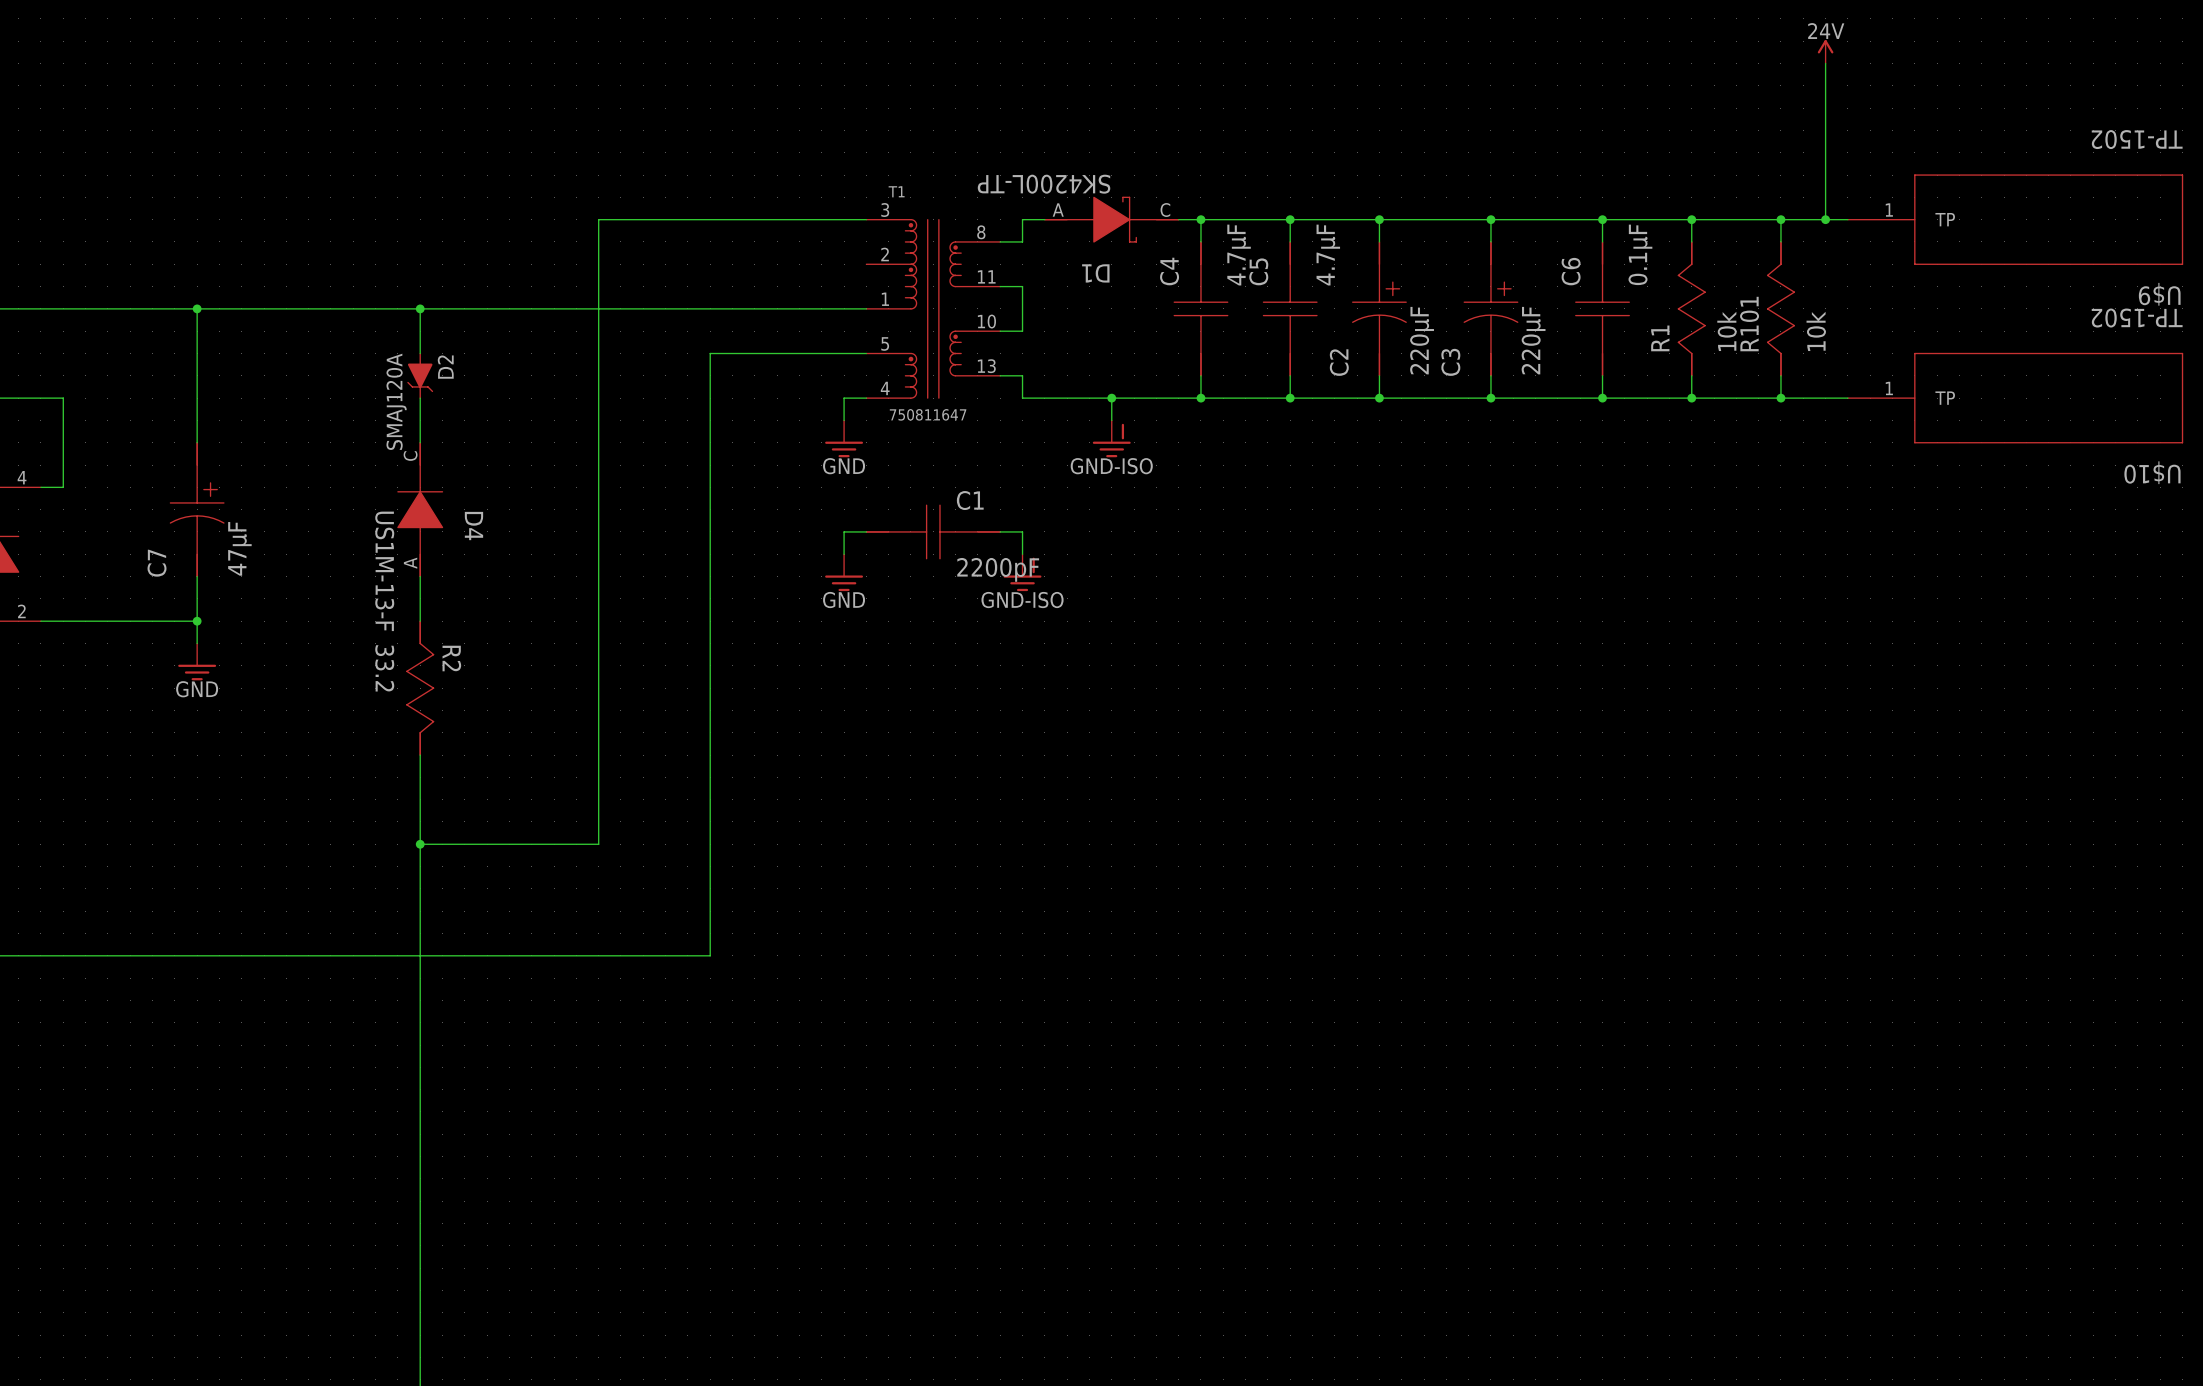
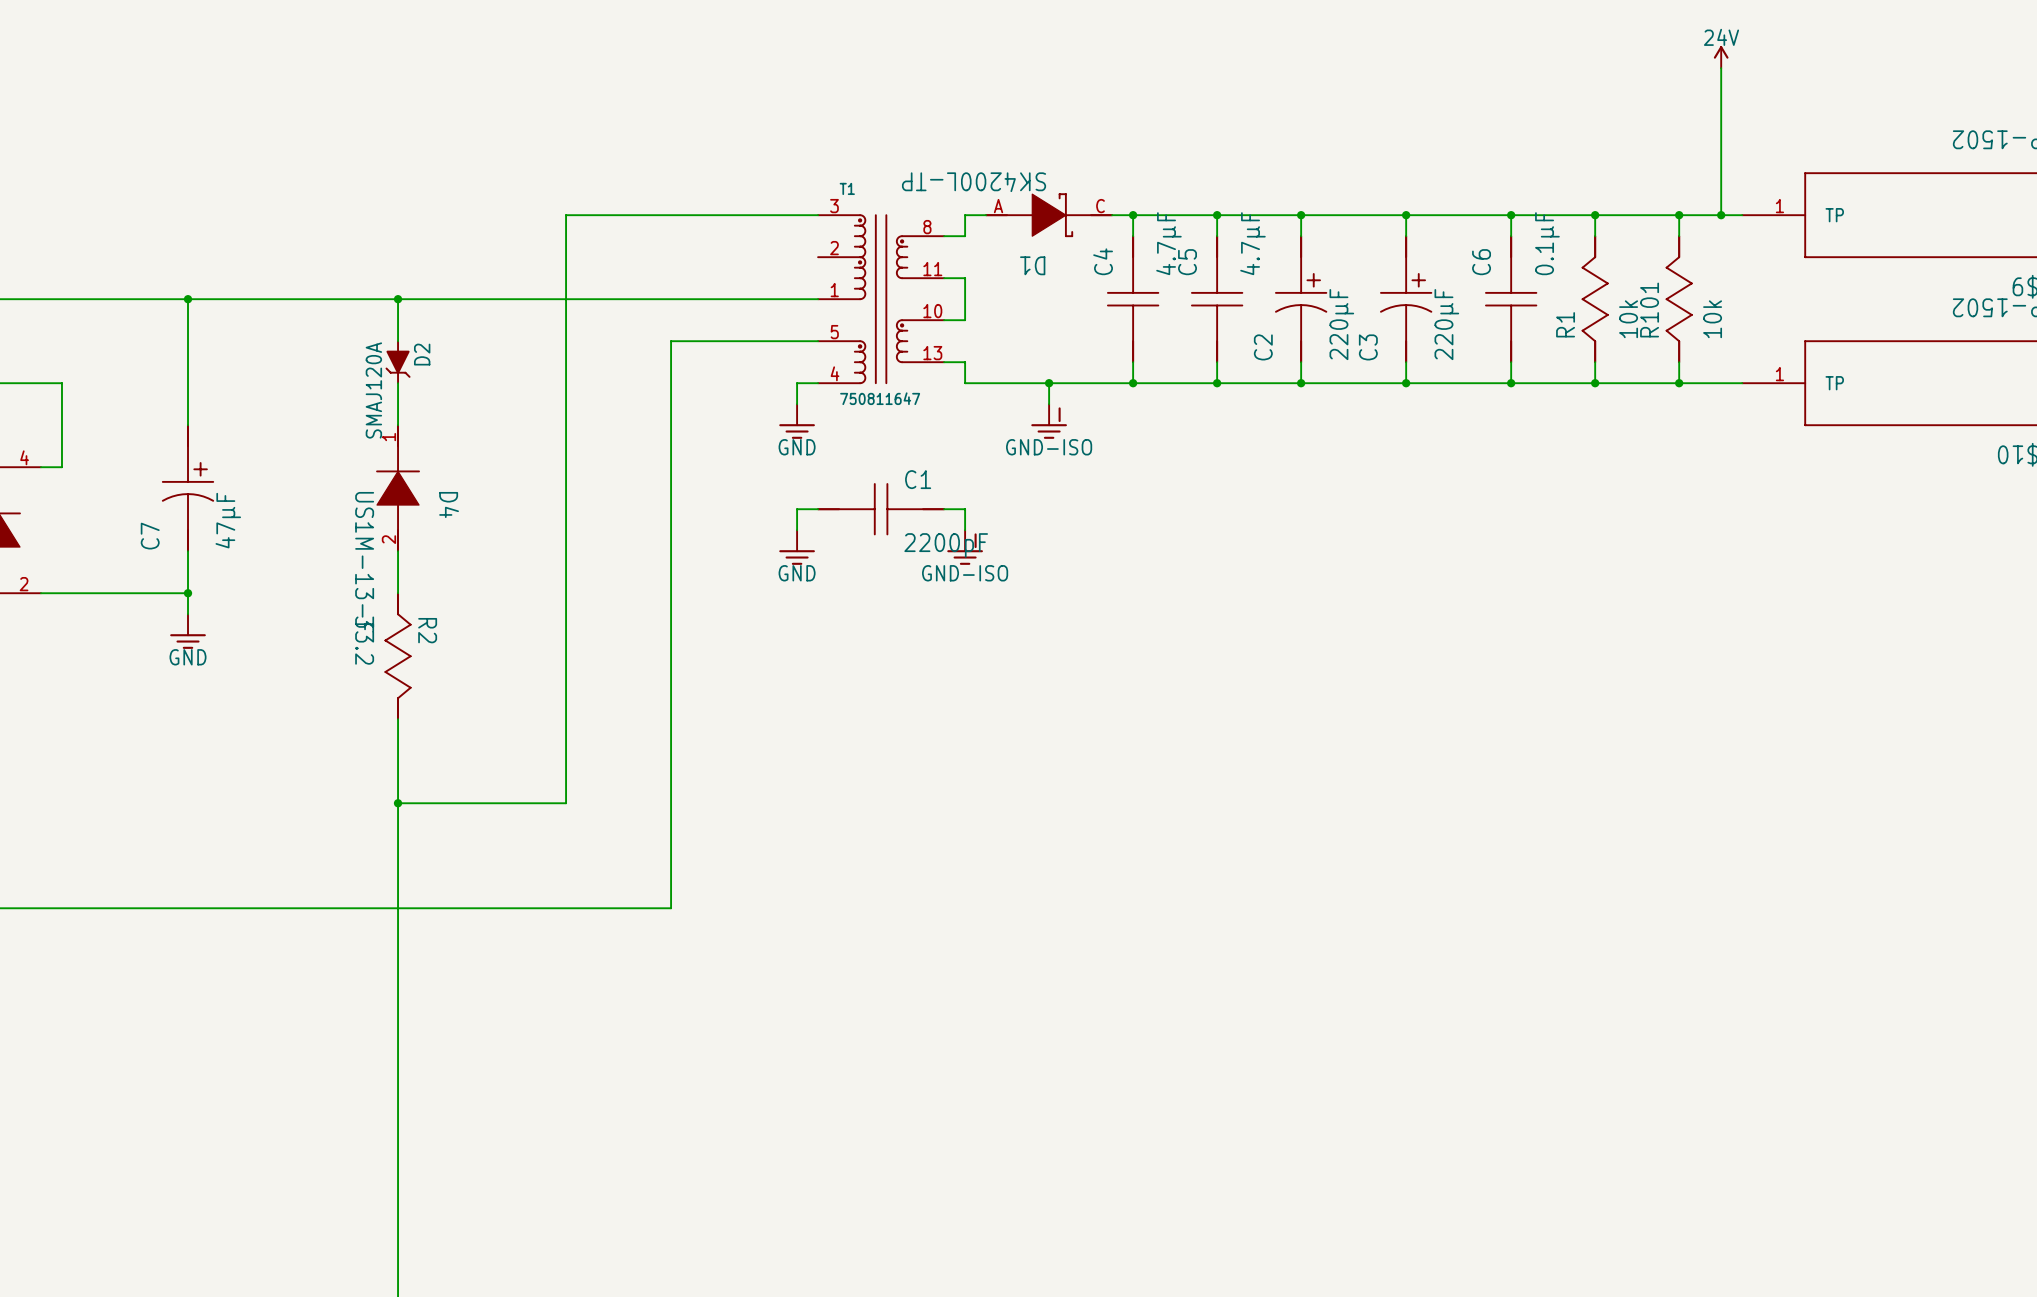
D4 pin number: C (410, 456) -> 1 (388, 437)
D4 pin number: A (410, 563) -> 2 (388, 539)

